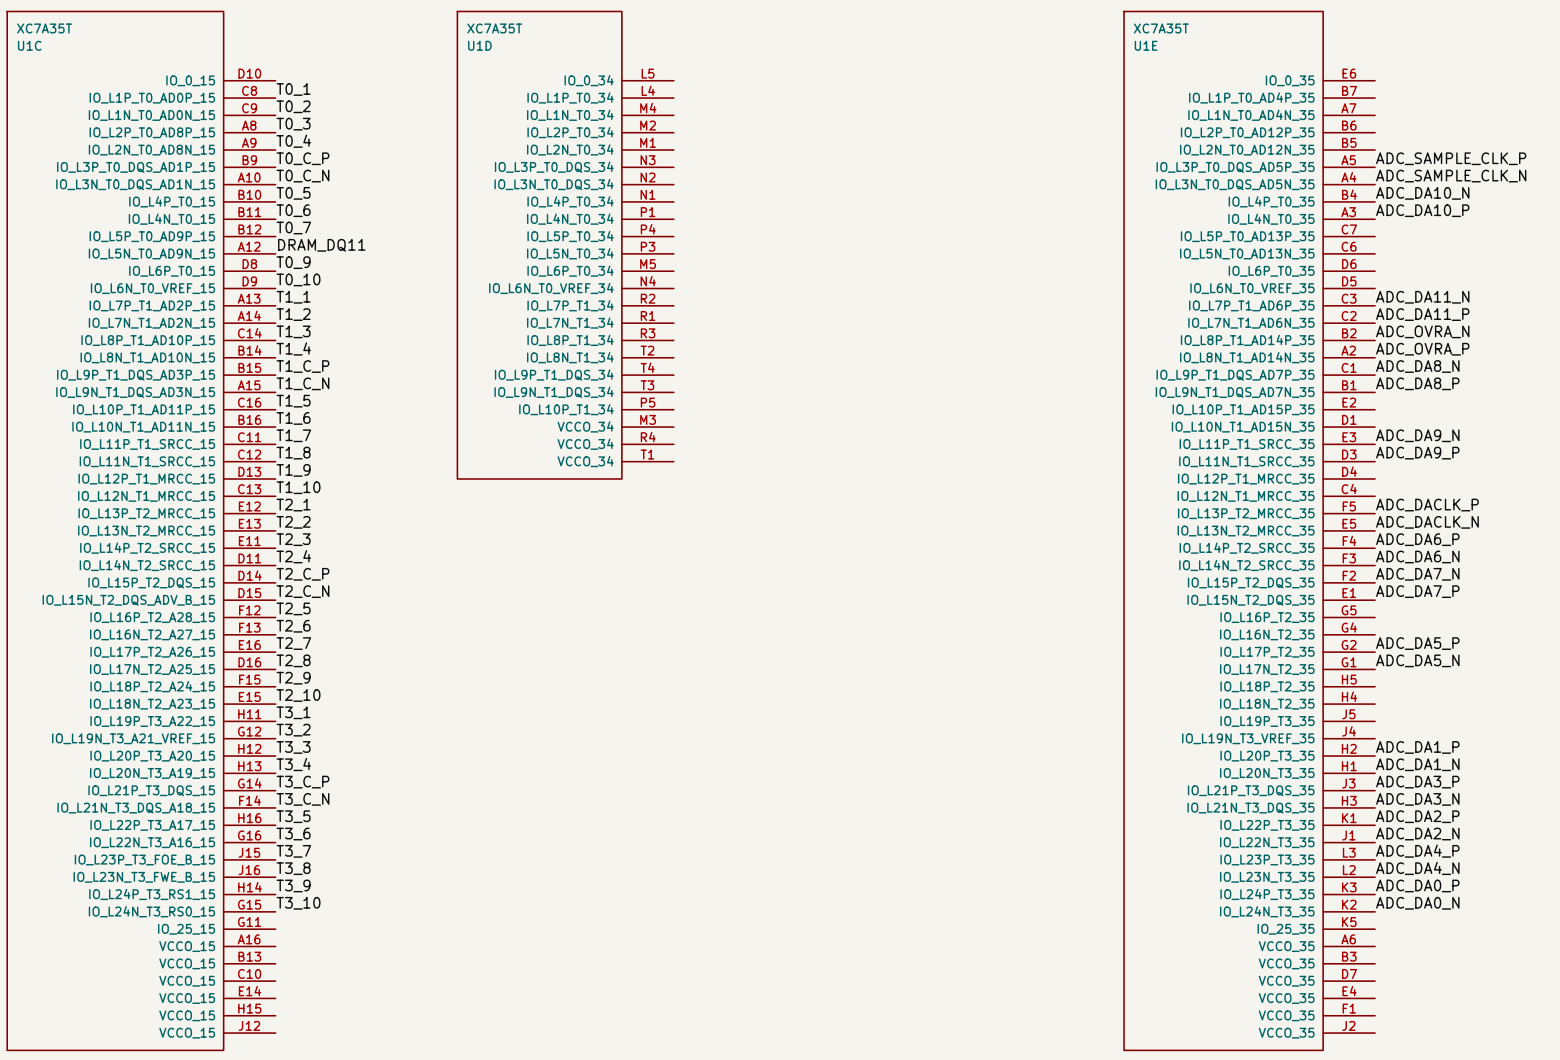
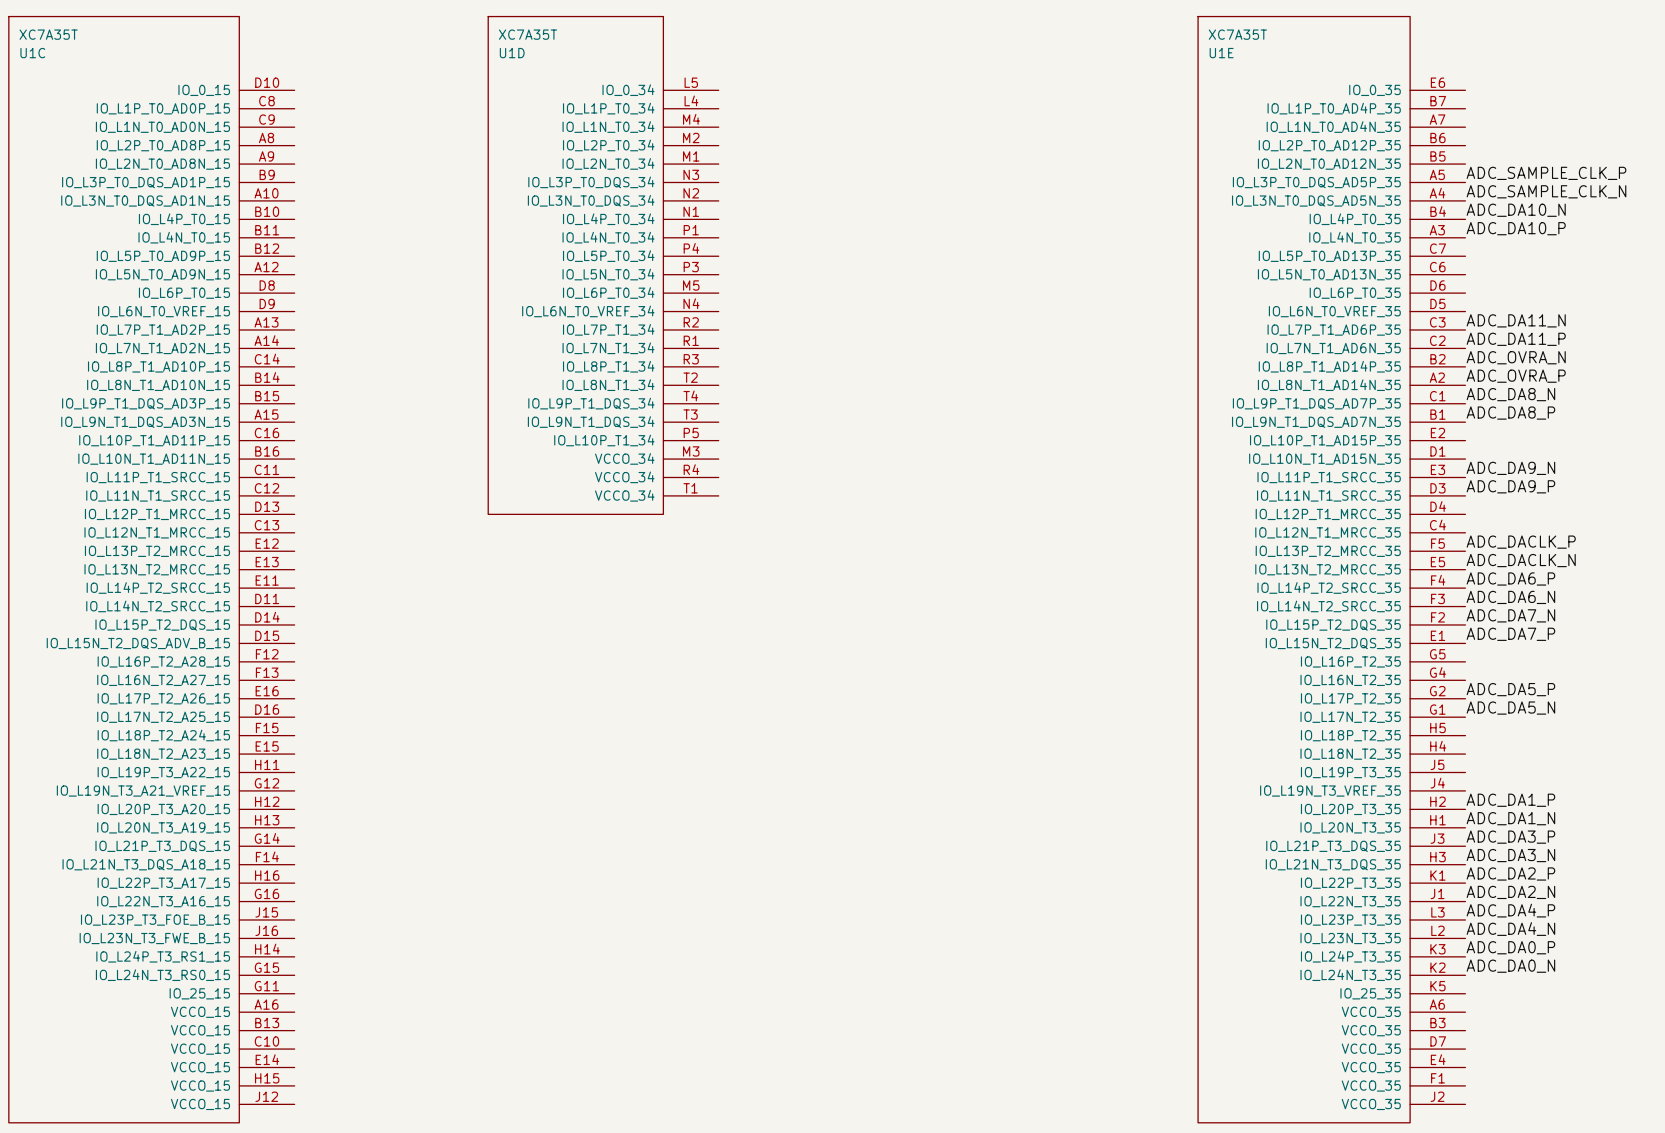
label: T0_1 (293, 89) -> none
label: T0_2 (293, 106) -> none
label: T0_3 (293, 124) -> none
label: T0_4 (293, 141) -> none
label: T0_C_P (302, 158) -> none
label: T0_C_N (302, 176) -> none
label: T0_5 (293, 193) -> none
label: T0_6 (293, 210) -> none
label: T0_7 (293, 228) -> none
label: DRAM_DQ11 (321, 245) -> none
label: T0_9 (293, 262) -> none
label: T0_10 (298, 279) -> none
label: T1_1 (293, 297) -> none
label: T1_2 (293, 314) -> none
label: T1_3 (293, 331) -> none
label: T1_4 (293, 348) -> none
label: T1_C_P (302, 366) -> none
label: T1_C_N (302, 383) -> none
label: T1_5 (293, 401) -> none
label: T1_6 (293, 418) -> none
label: T1_7 (293, 435) -> none
label: T1_8 (293, 453) -> none
label: T1_9 (293, 470) -> none
label: T1_10 (298, 487) -> none
label: T2_1 (293, 505) -> none
label: T2_2 (293, 522) -> none
label: T2_3 (293, 539) -> none
label: T2_4 (293, 556) -> none
label: T2_C_P (302, 574) -> none
label: T2_C_N (302, 591) -> none
label: T2_5 (293, 608) -> none
label: T2_6 (293, 626) -> none
label: T2_7 (293, 643) -> none
label: T2_8 (293, 660) -> none
label: T2_9 (293, 678) -> none
label: T2_10 (298, 695) -> none
label: T3_1 (293, 712) -> none
label: T3_2 (293, 730) -> none
label: T3_3 (293, 747) -> none
label: T3_4 (293, 764) -> none
label: T3_C_P (302, 782) -> none
label: T3_C_N (302, 799) -> none
label: T3_5 (293, 816) -> none
label: T3_6 (293, 834) -> none
label: T3_7 (293, 851) -> none
label: T3_8 (293, 868) -> none
label: T3_9 (293, 885) -> none
label: T3_10 (298, 903) -> none

